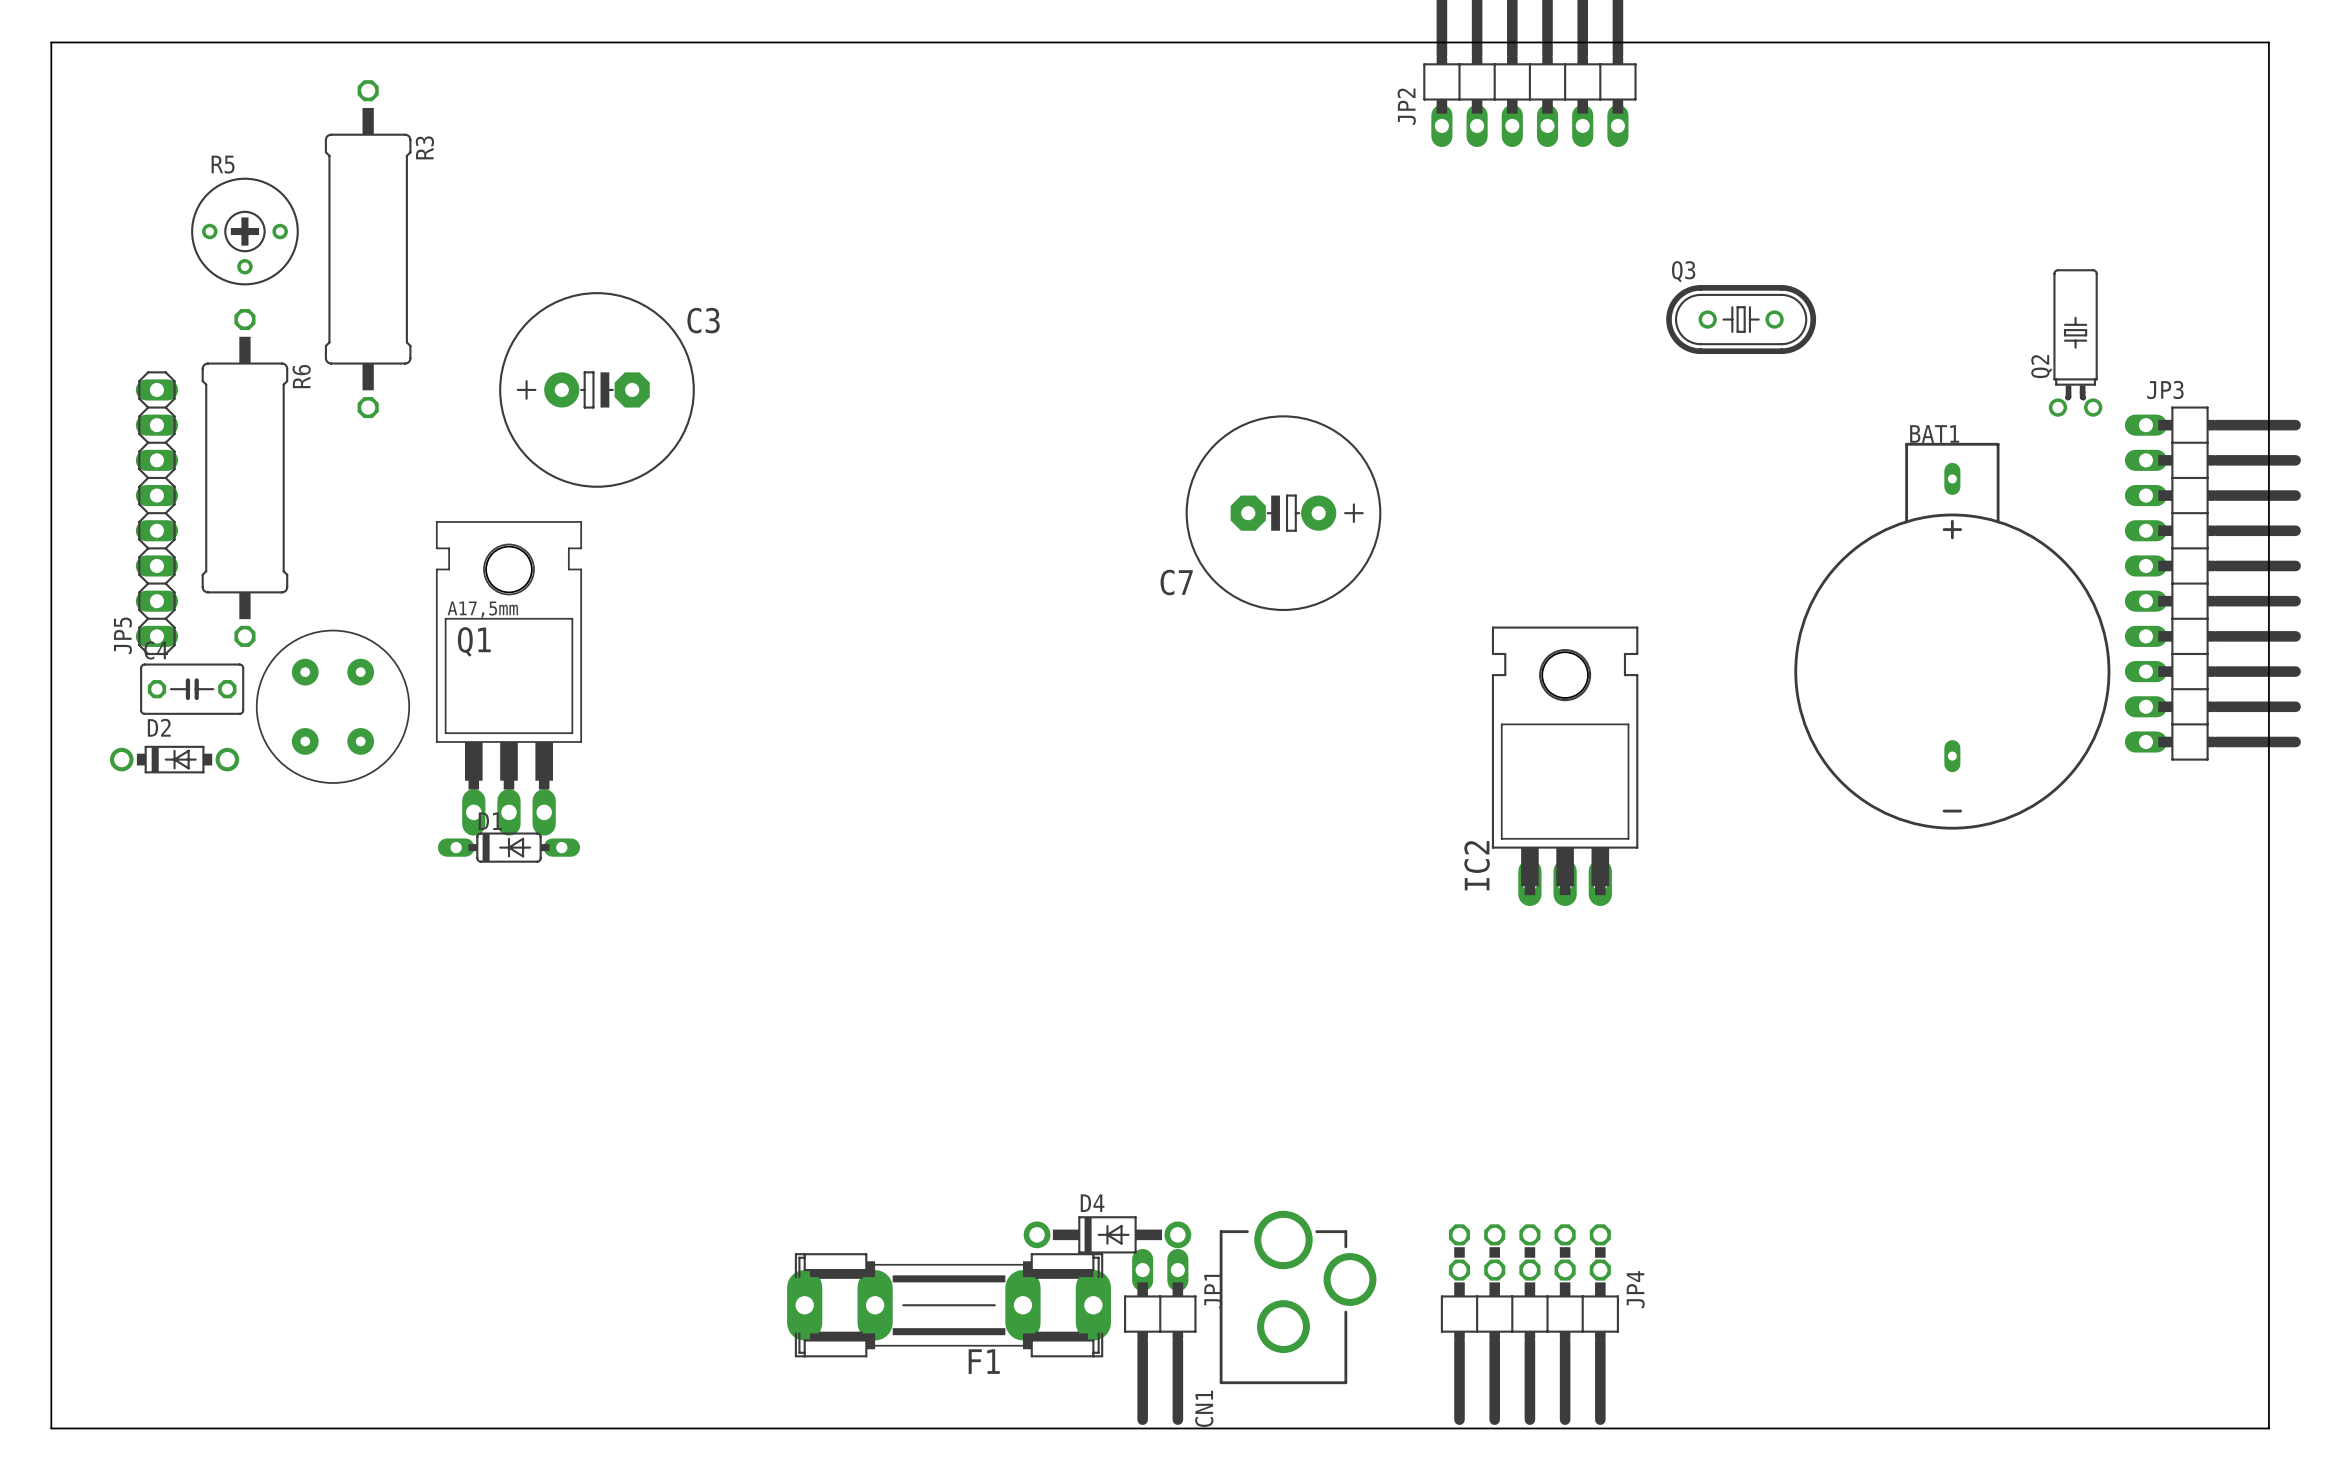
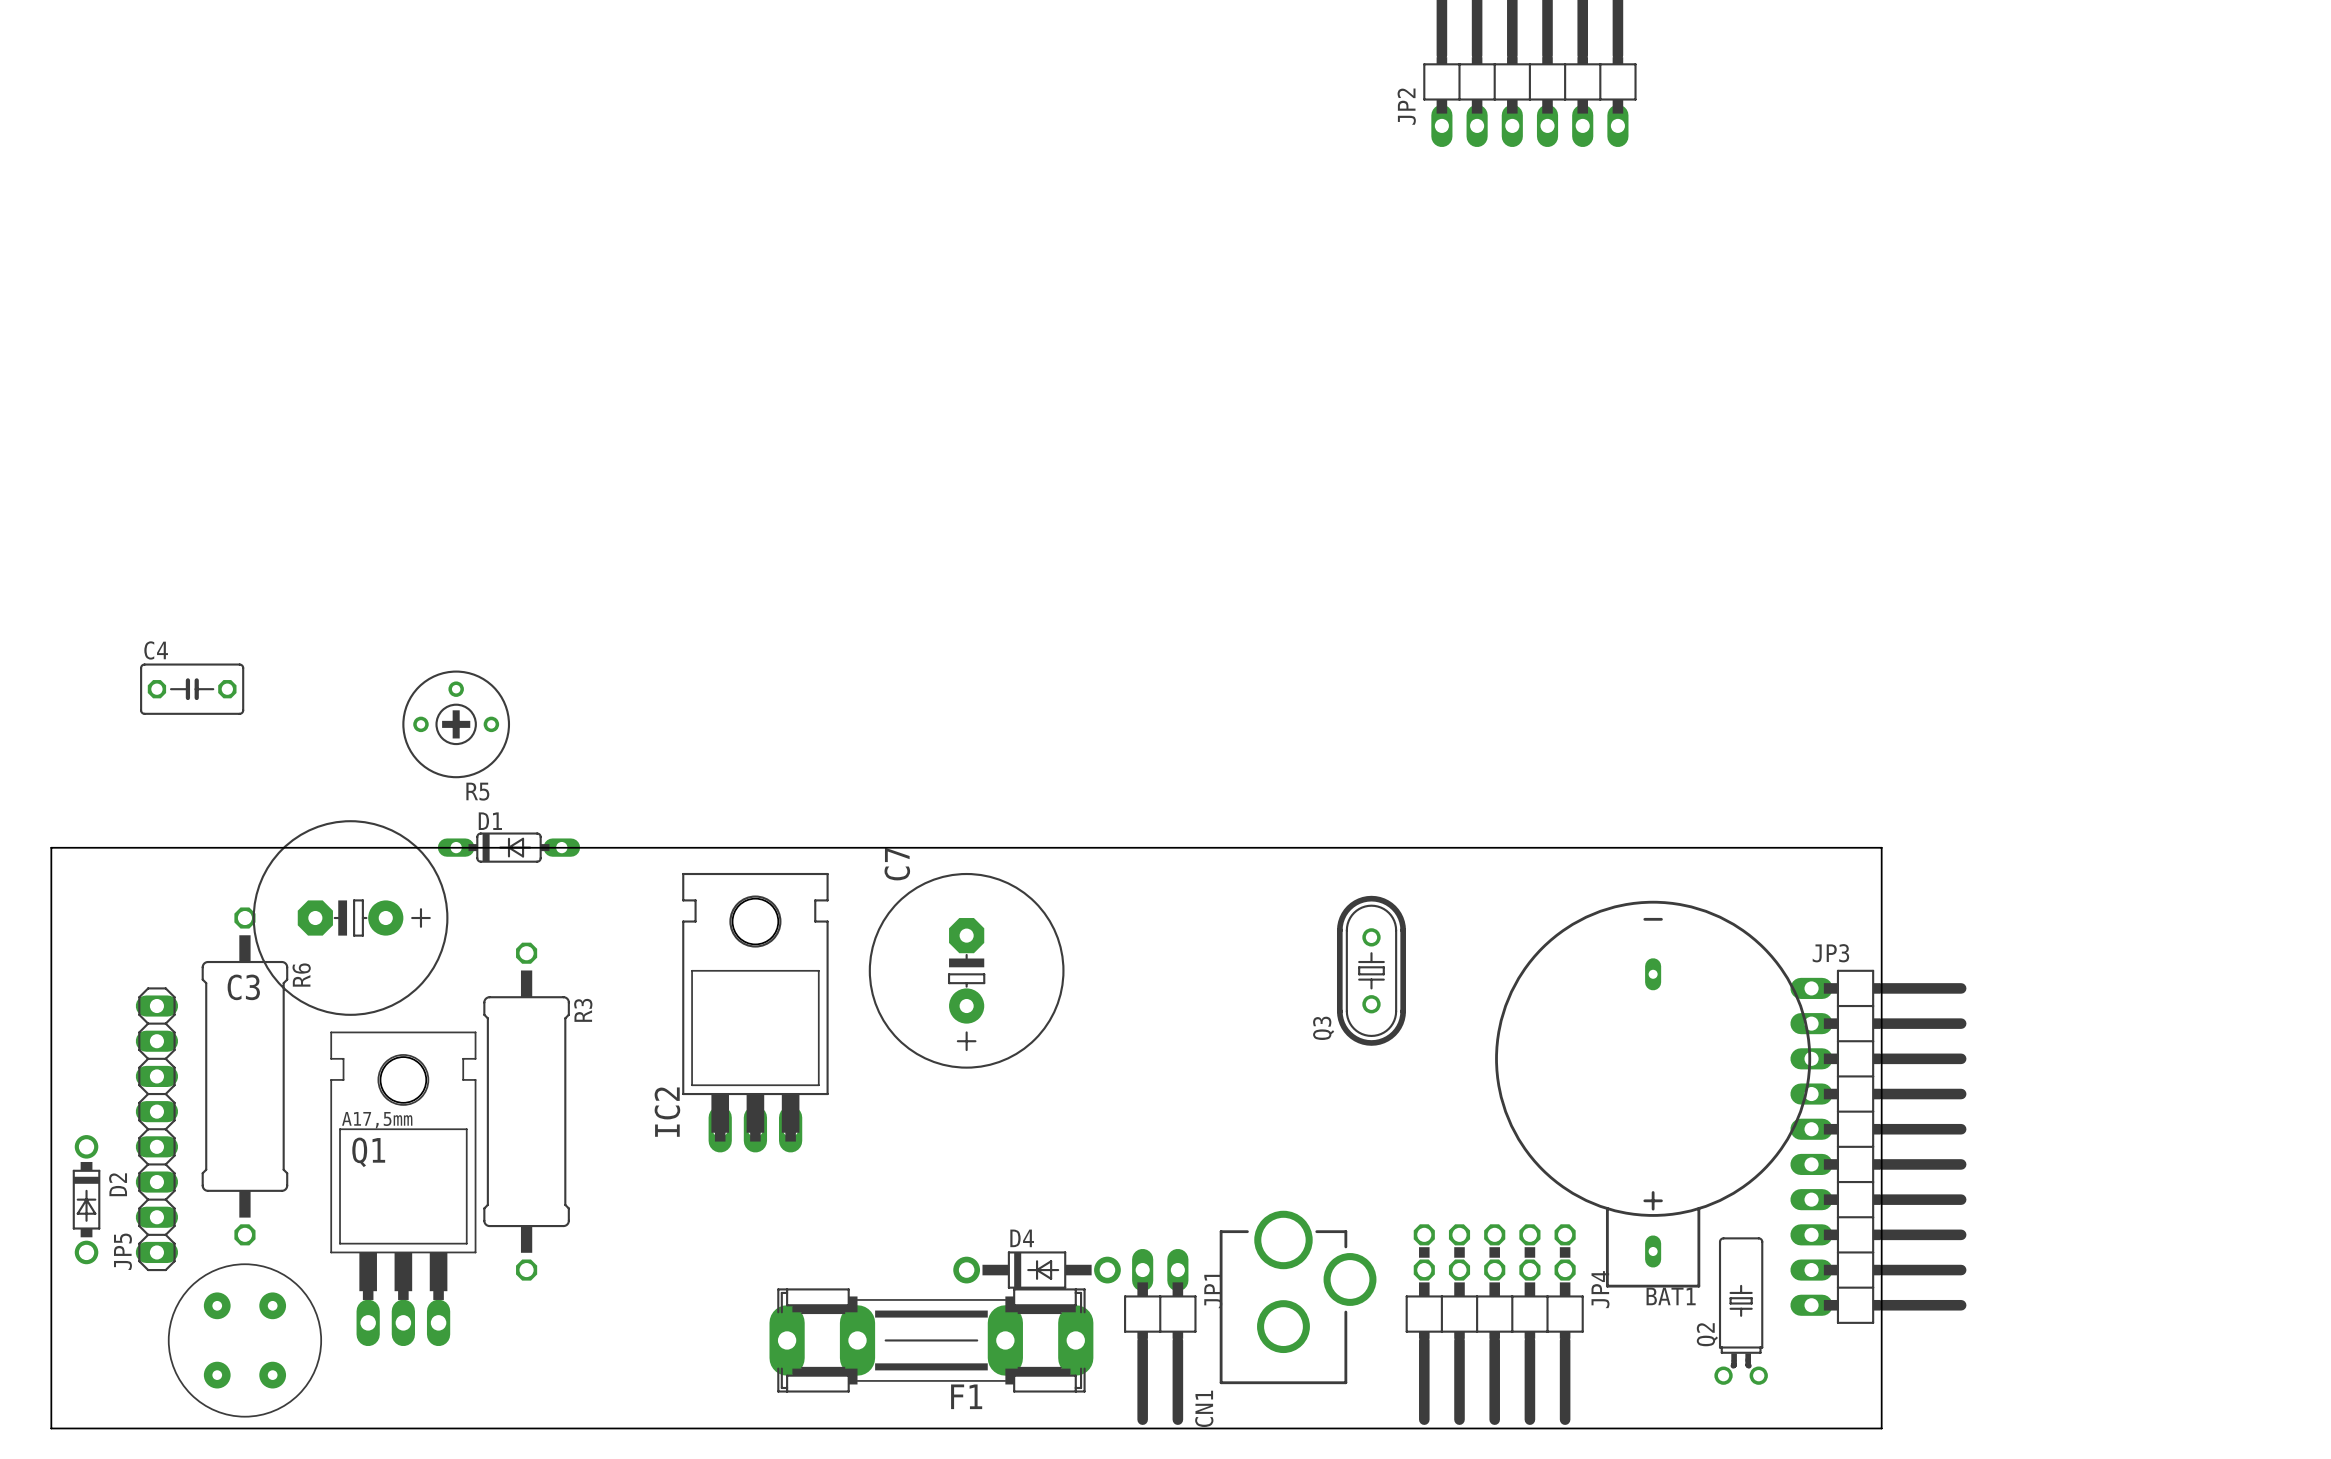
R5 rotation: 0° (244, 231) -> 180° (456, 724)
R5 position: (244, 231) -> (456, 724)
R3 position: (368, 249) -> (526, 1111)
Q3 name position: Q3 (1683, 271) -> Q3 (1323, 1028)
Q3 rotation: 0° (1741, 319) -> 90° clockwise (1371, 970)
Q3 position: (1741, 319) -> (1371, 970)
Q2 position: (2075, 342) -> (1741, 1311)
C3 rotation: 0° (596, 389) -> 180° (350, 918)
C3 position: (596, 389) -> (350, 918)
R6 position: (244, 477) -> (244, 1076)
JP5 position: (156, 513) -> (156, 1129)
C7 rotation: 0° (1283, 513) -> 90° clockwise (966, 970)
C7 position: (1283, 513) -> (966, 970)
JP3 position: (2212, 583) -> (1878, 1146)
BAT1 rotation: 0° (1952, 636) -> 180° (1653, 1094)
BAT1 position: (1952, 636) -> (1653, 1094)
Q1 position: (508, 678) -> (403, 1188)
part: (332, 706) -> none
D2 rotation: 0° (174, 759) -> 90° clockwise (86, 1199)
D2 position: (174, 759) -> (86, 1199)
IC2 position: (1565, 766) -> (755, 1012)
board edge: (51, 847) (51, 42) (2268, 42) (2268, 1428) (1881, 1428) -> (51, 847) (1881, 847) (1881, 1428)
D4 position: (1107, 1234) -> (1037, 1270)
F1 position: (949, 1305) -> (931, 1340)
JP4 position: (1529, 1324) -> (1494, 1324)
part: none -> (244, 1340)

